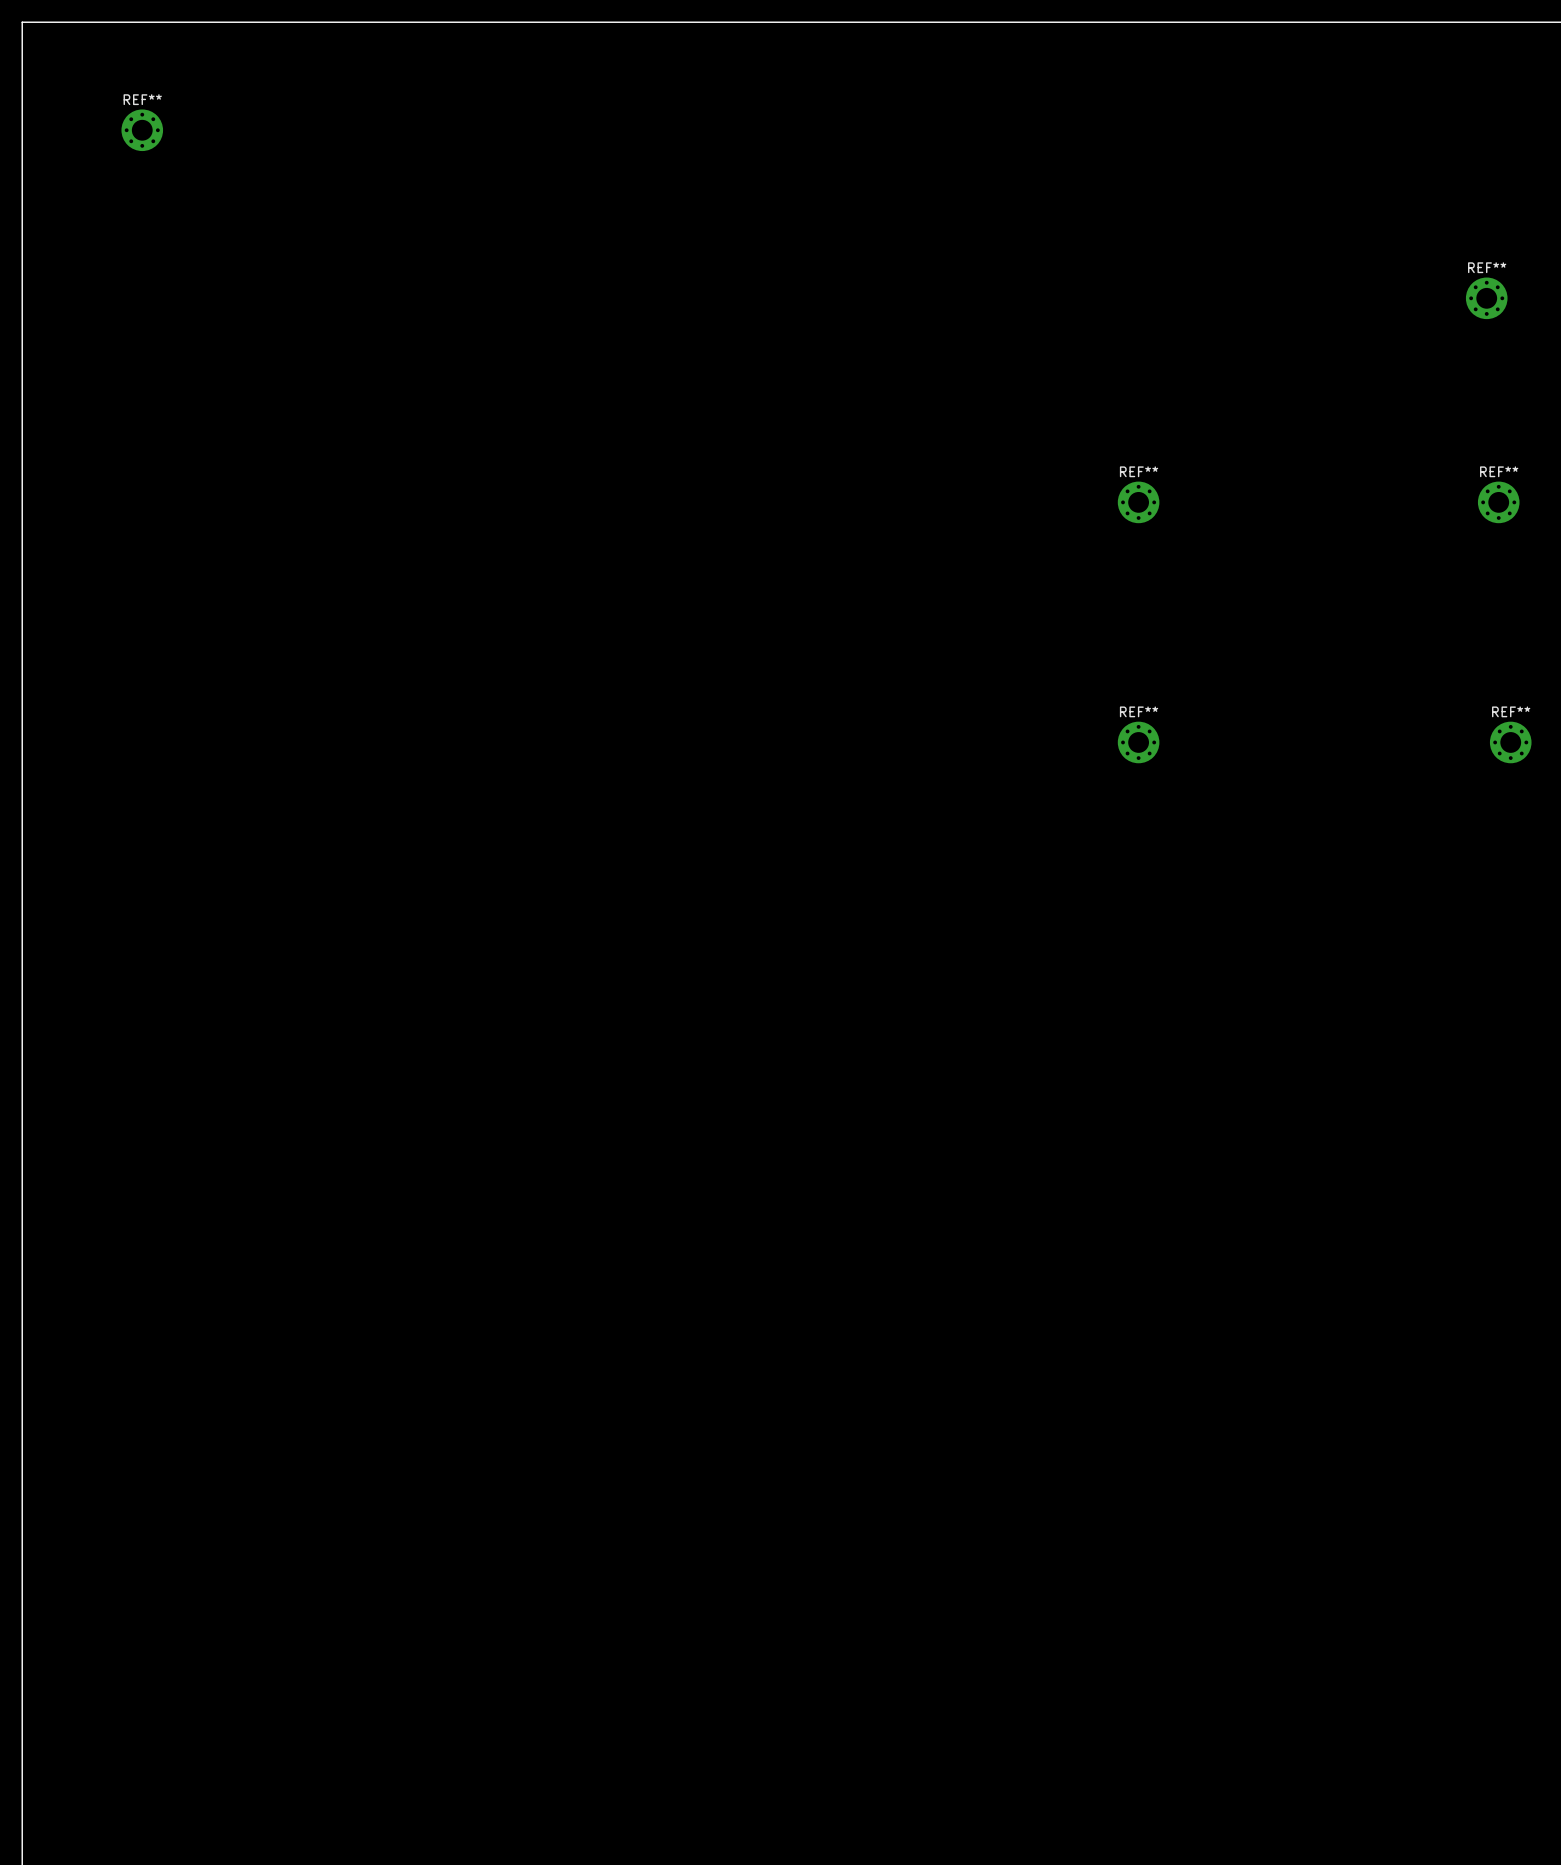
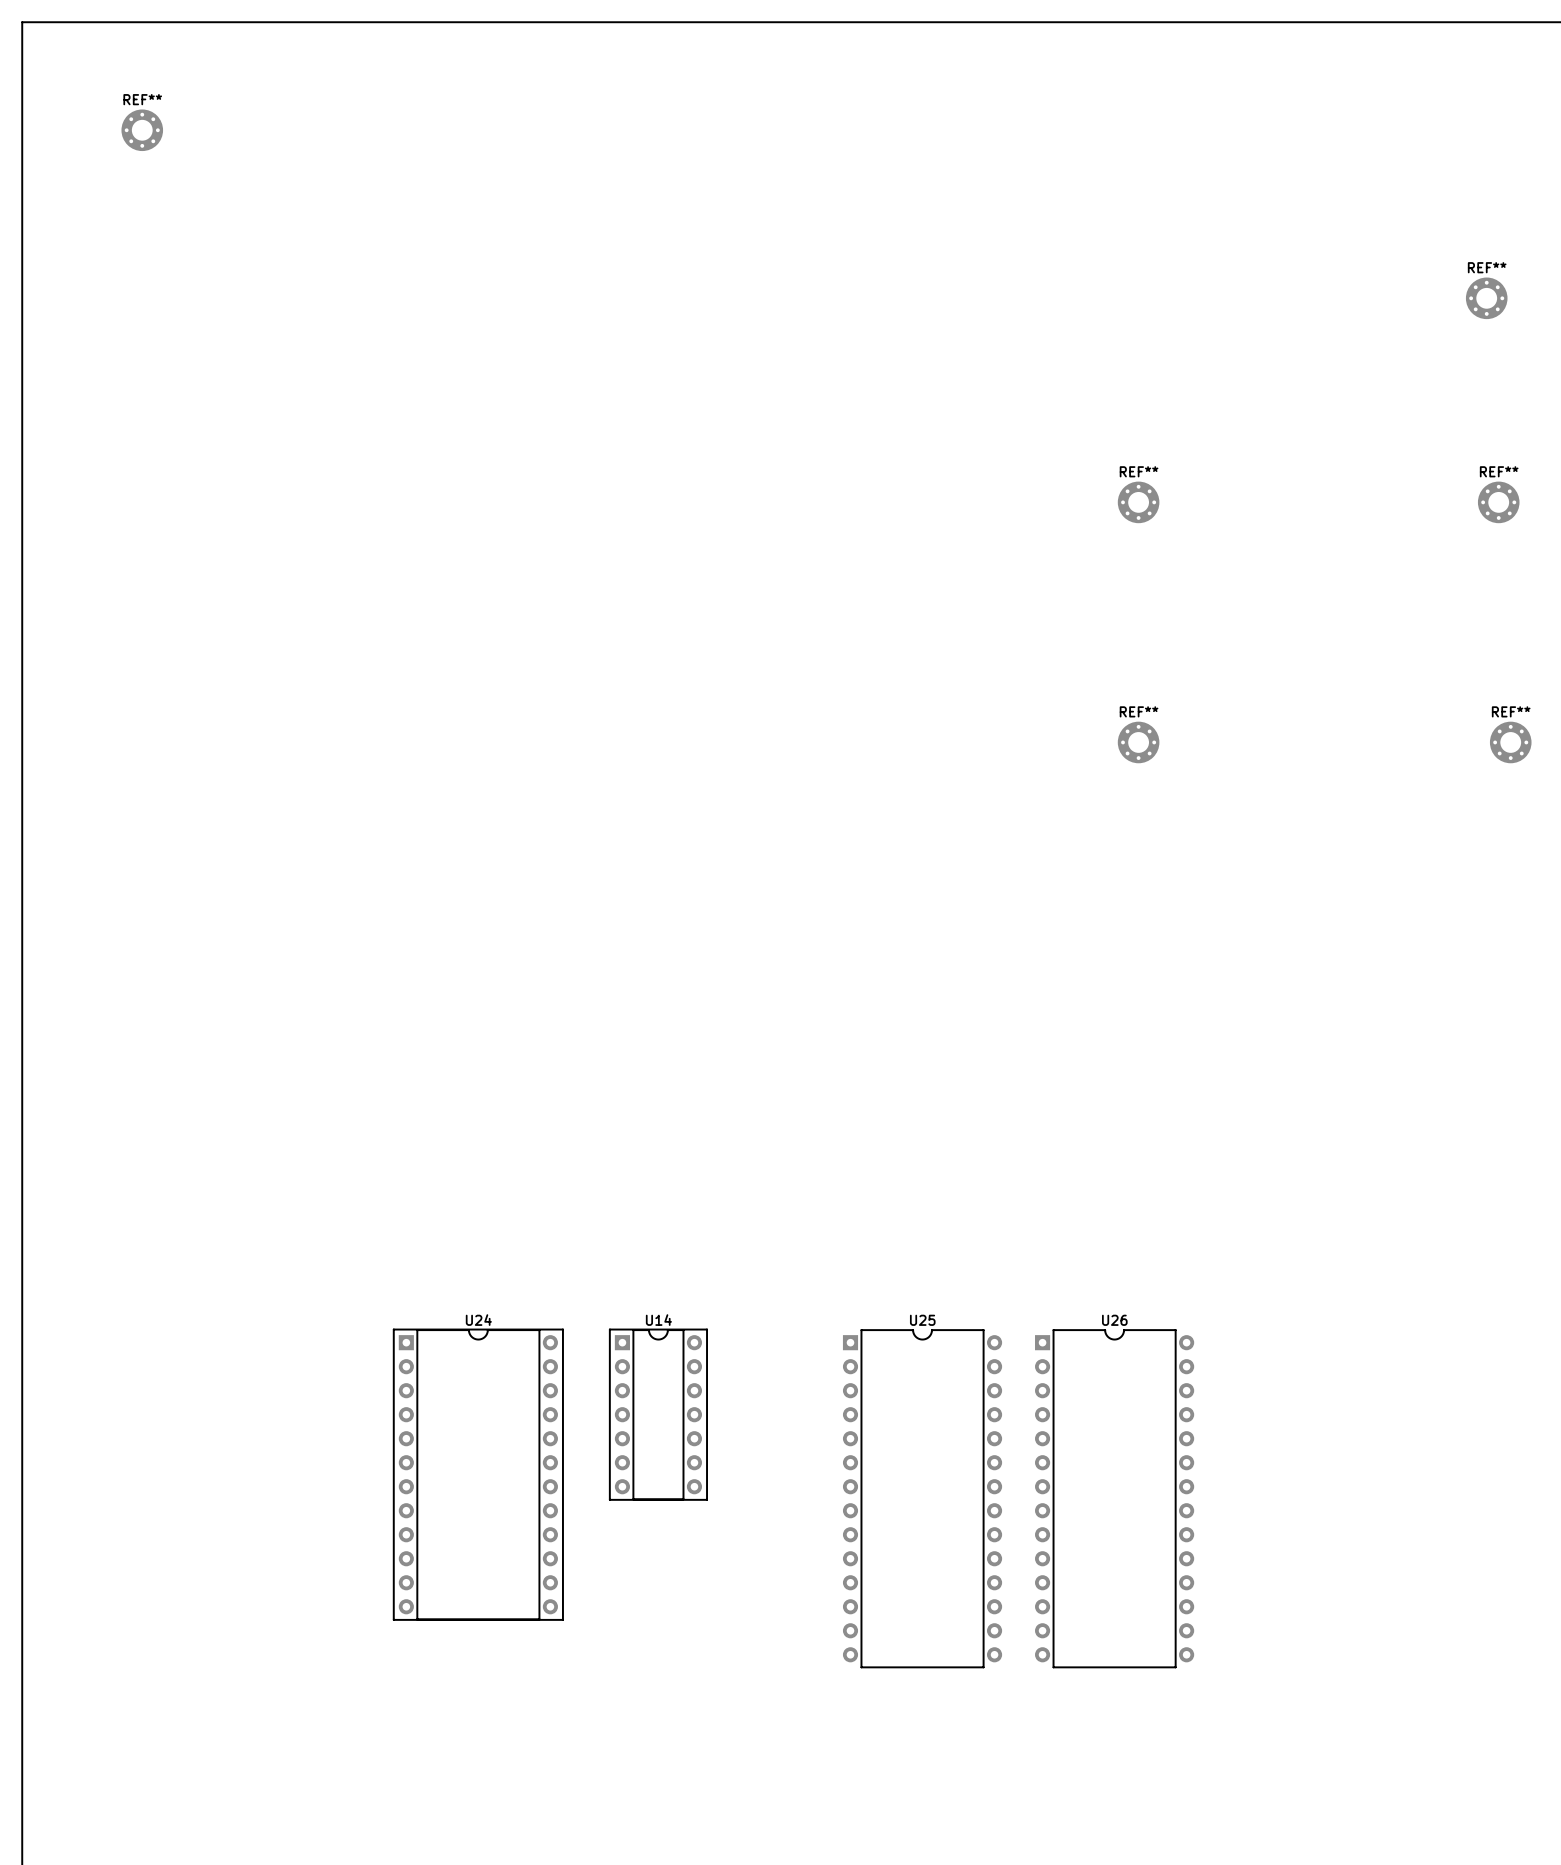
U14: none -> (658, 1414)
U24: none -> (478, 1474)
U25: none -> (922, 1498)
U26: none -> (1114, 1498)

